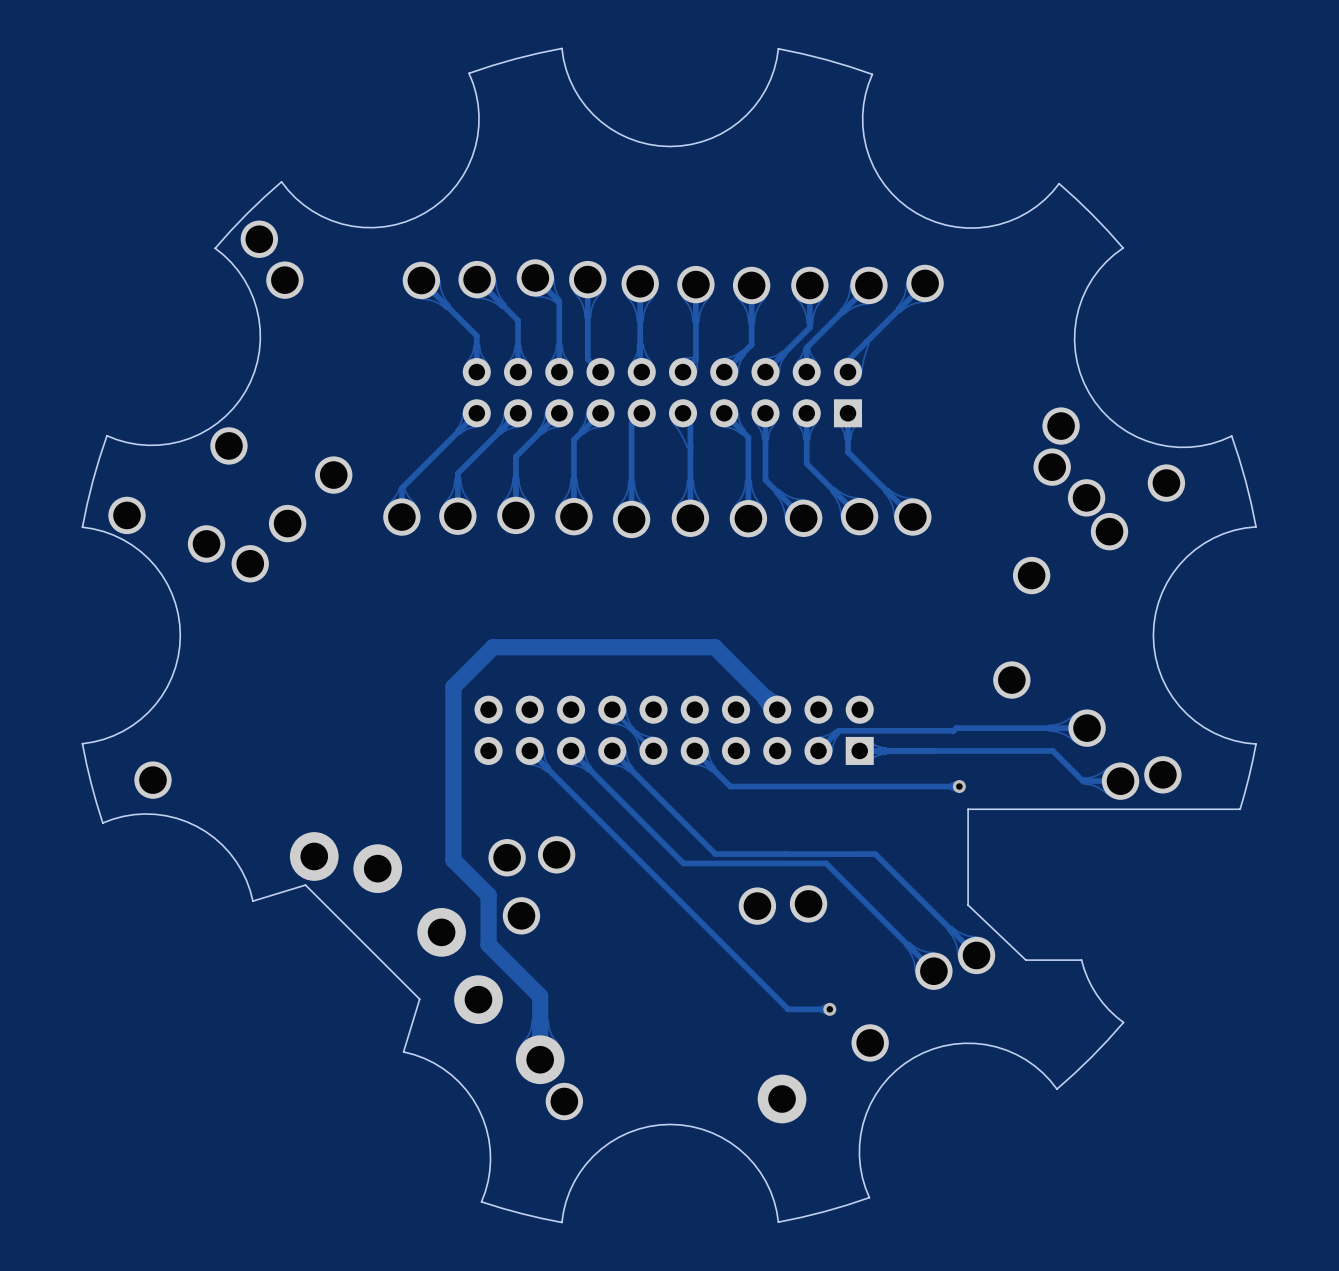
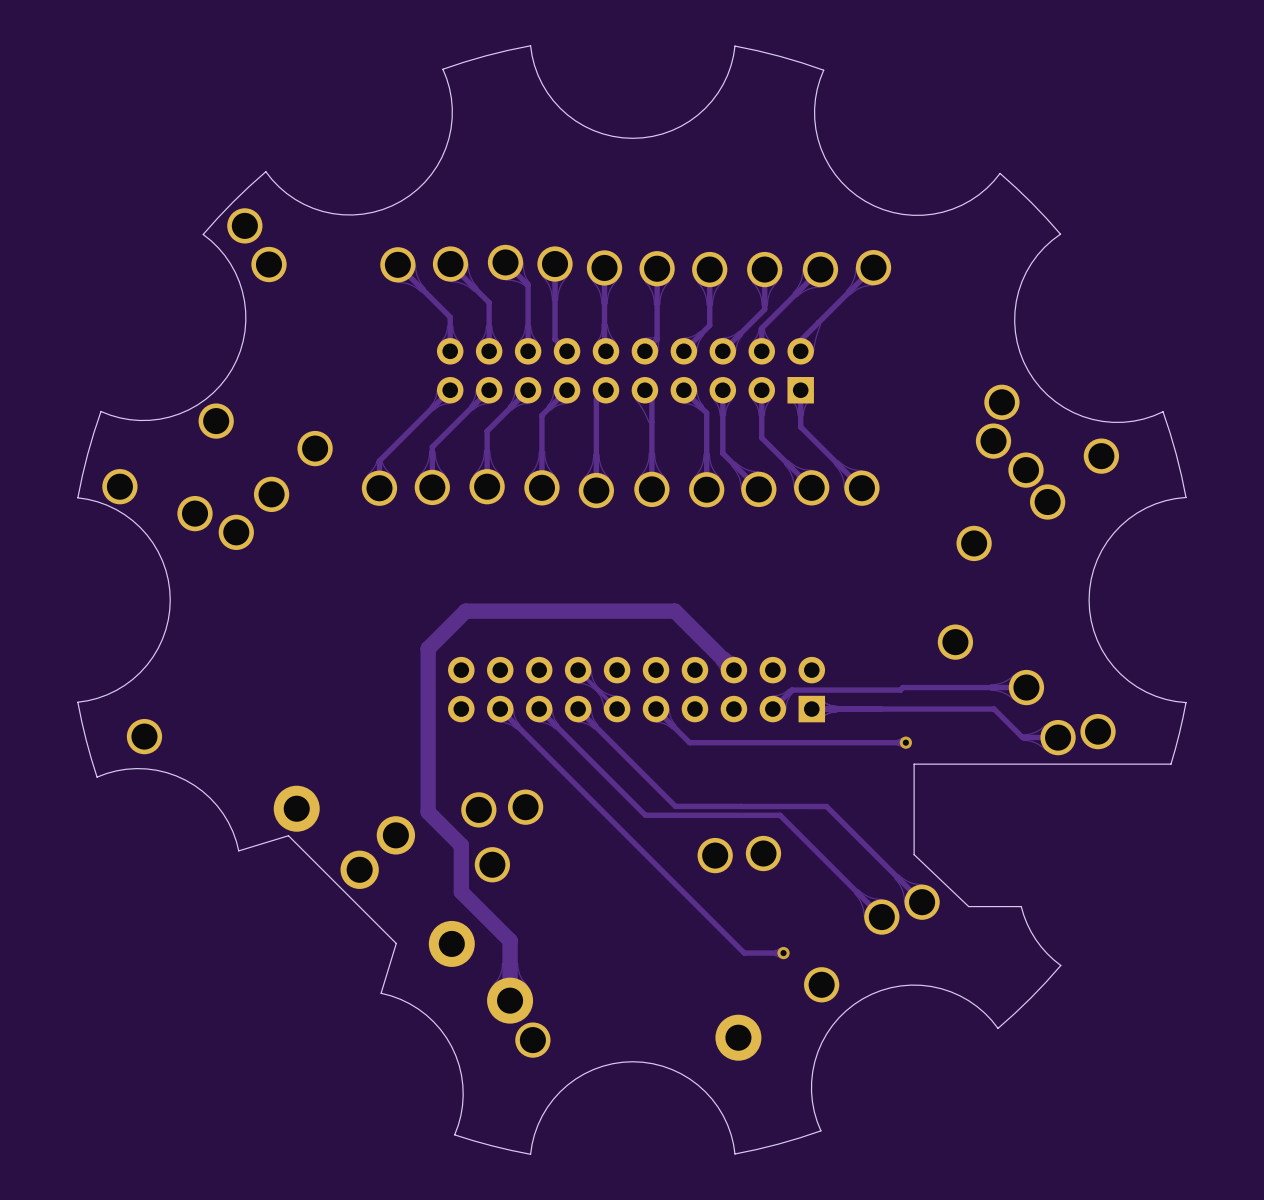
part: (377, 868) -> none
part: none -> (395, 835)
part: none -> (359, 869)
part: (441, 932) -> none

